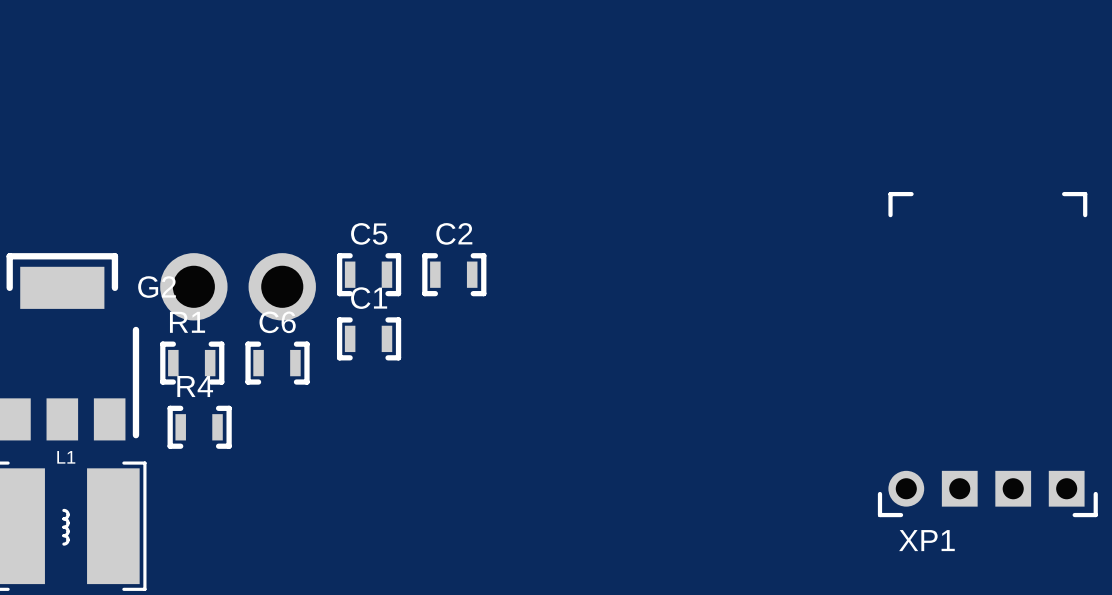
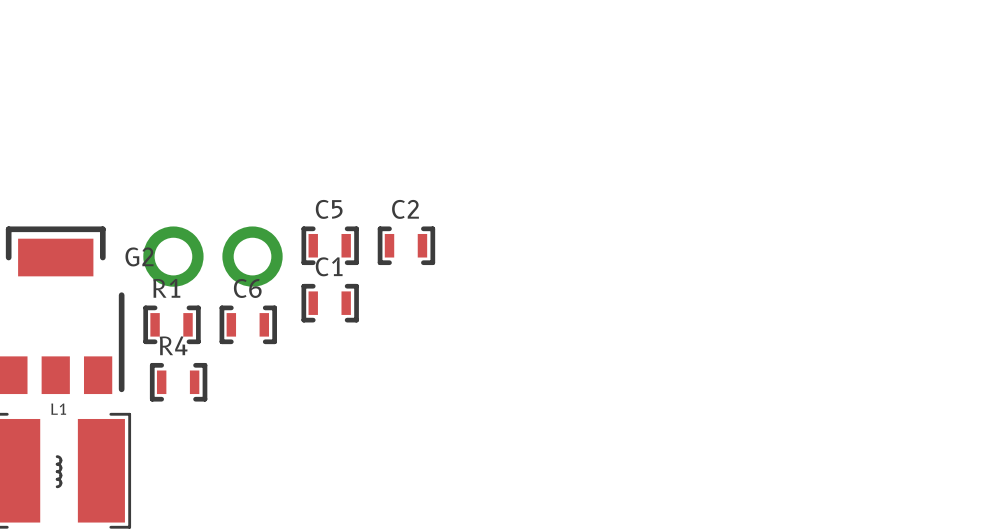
XP1: (987, 354) -> none

